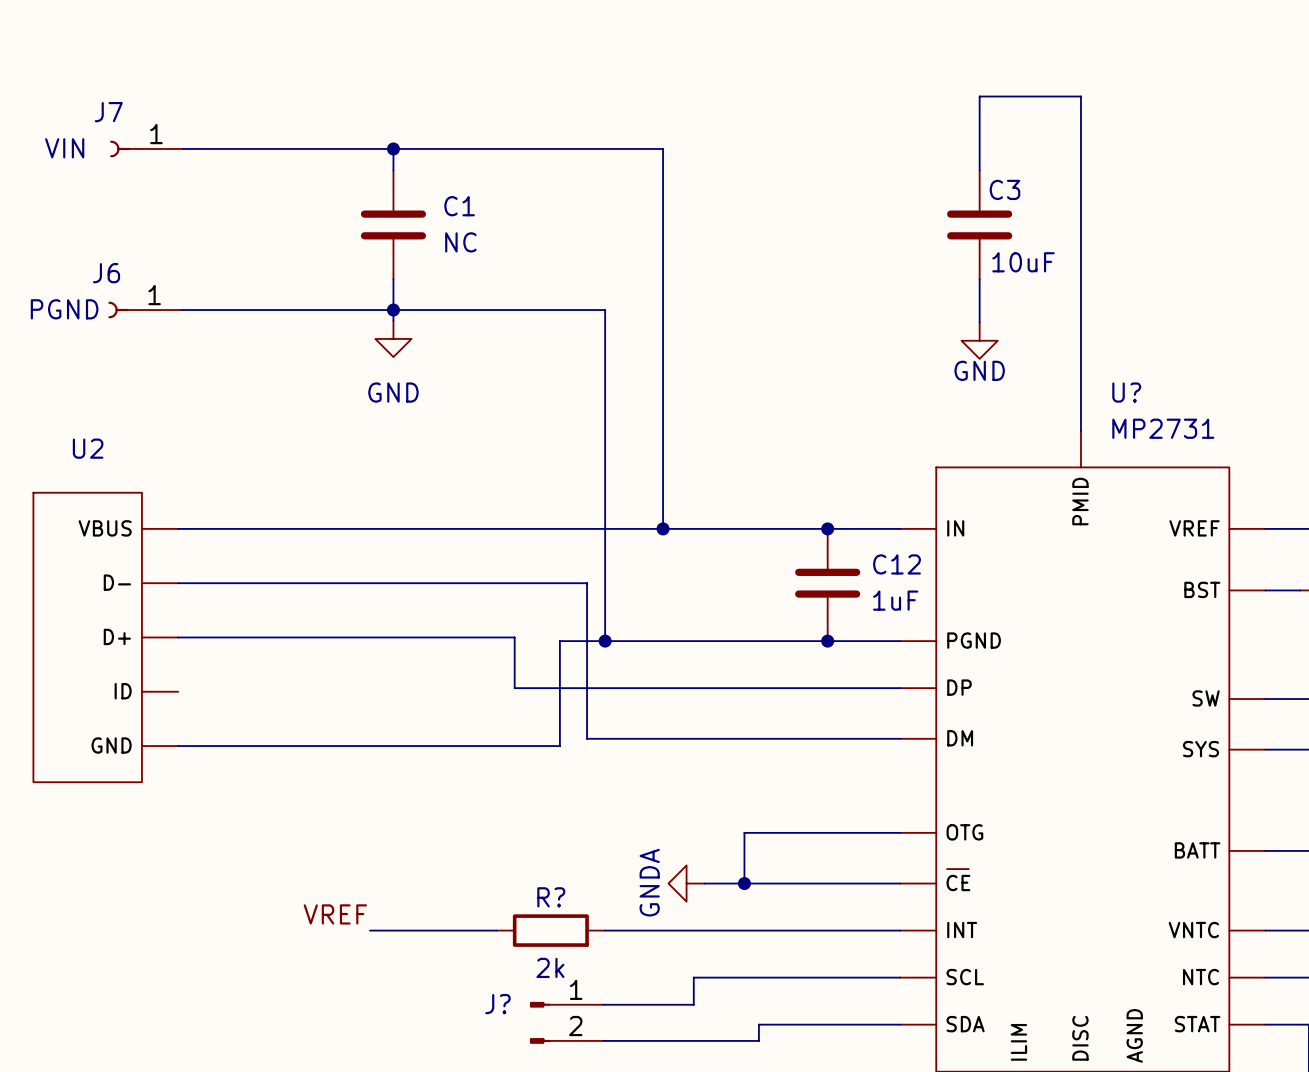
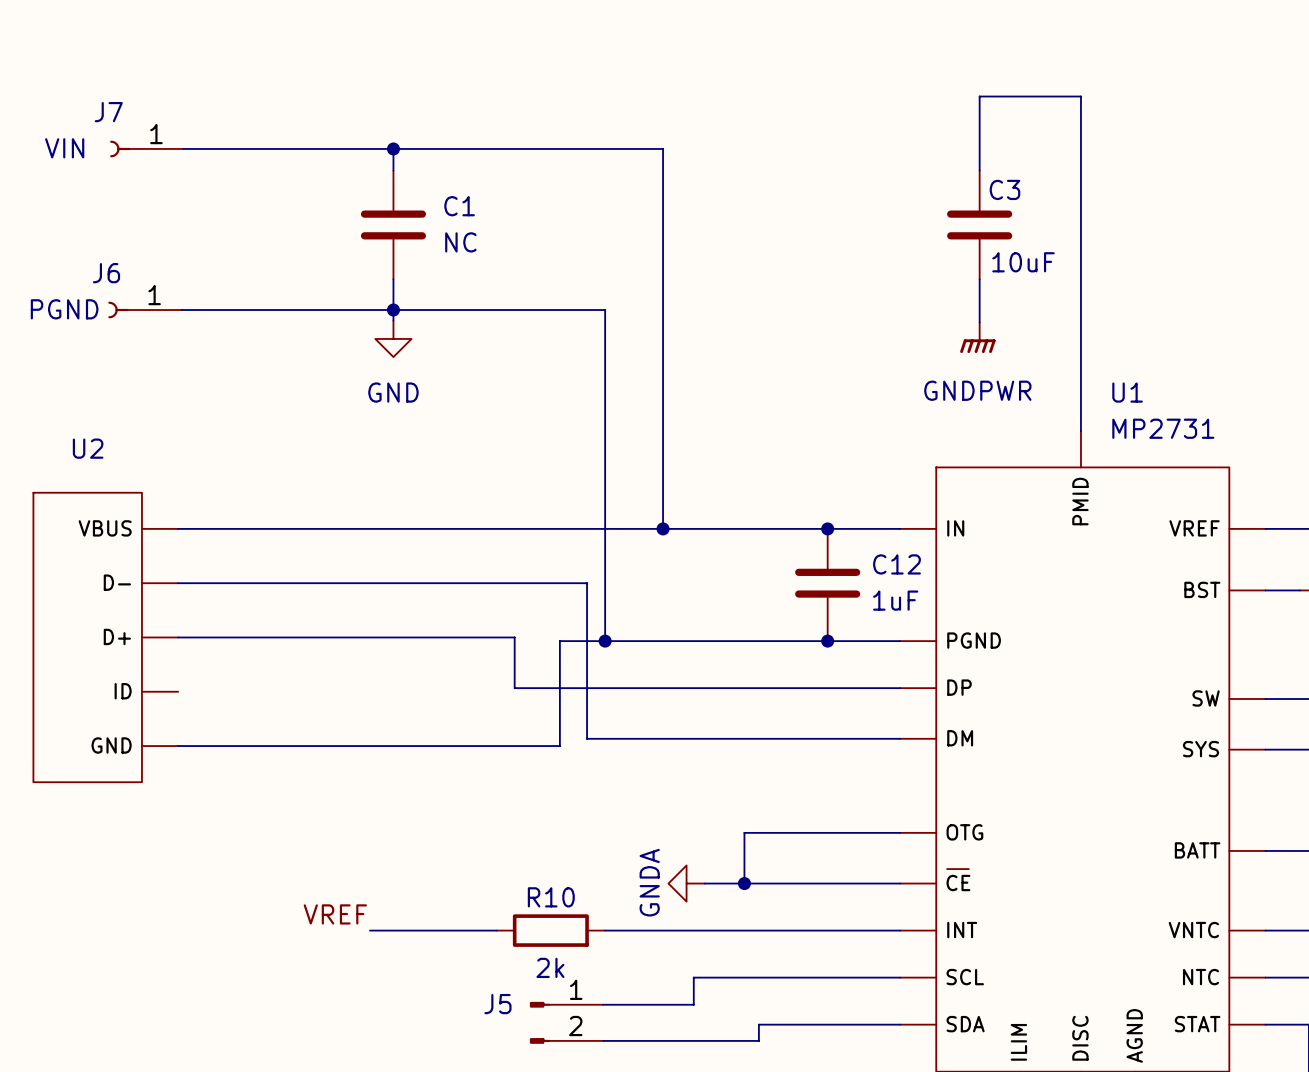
power symbol: GND (979, 340) -> GNDPWR (977, 337)
U? name: U? (1126, 392) -> U1 (1127, 392)
R? name: R? (551, 897) -> R10 (551, 897)
J? name: J? (497, 1004) -> J5 (497, 1004)

